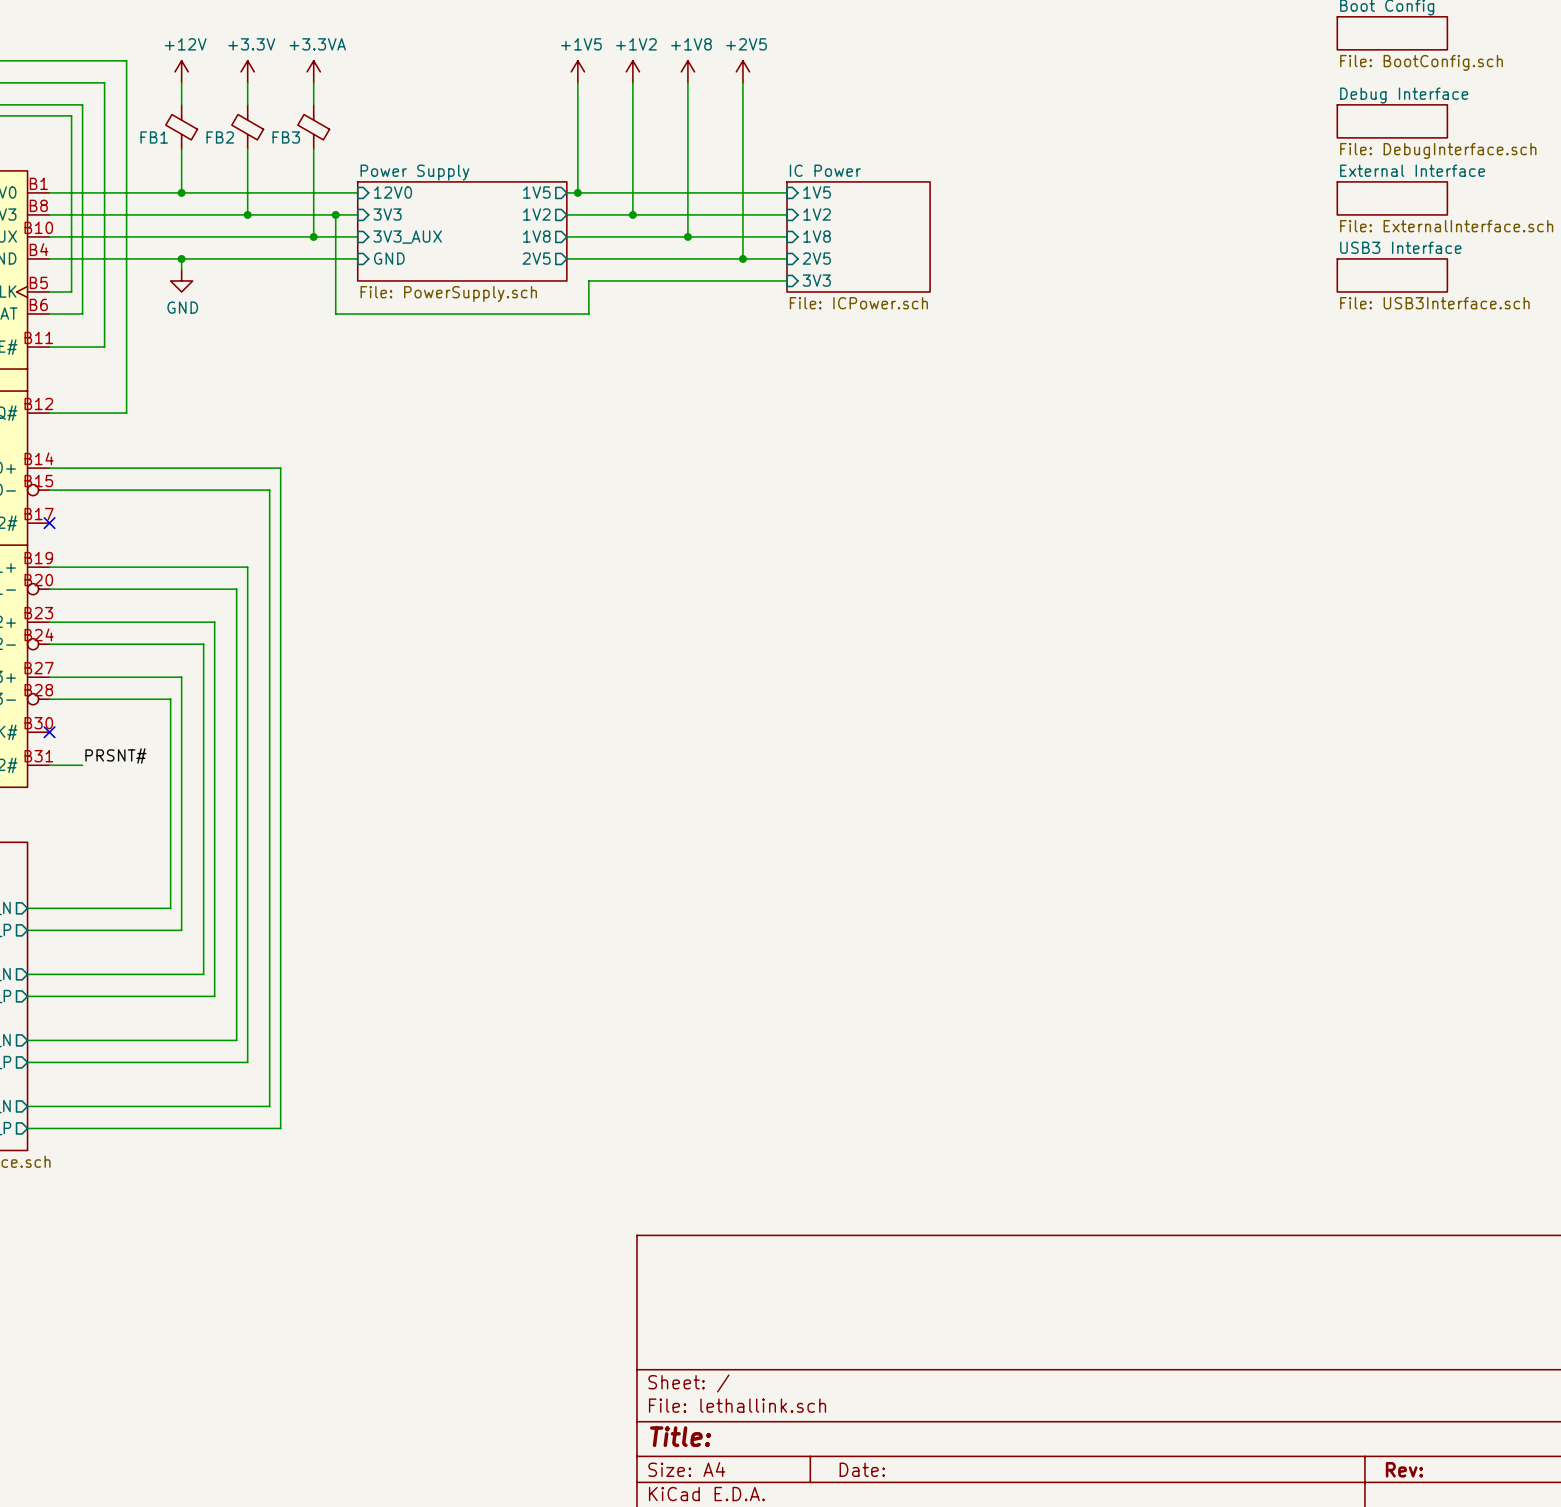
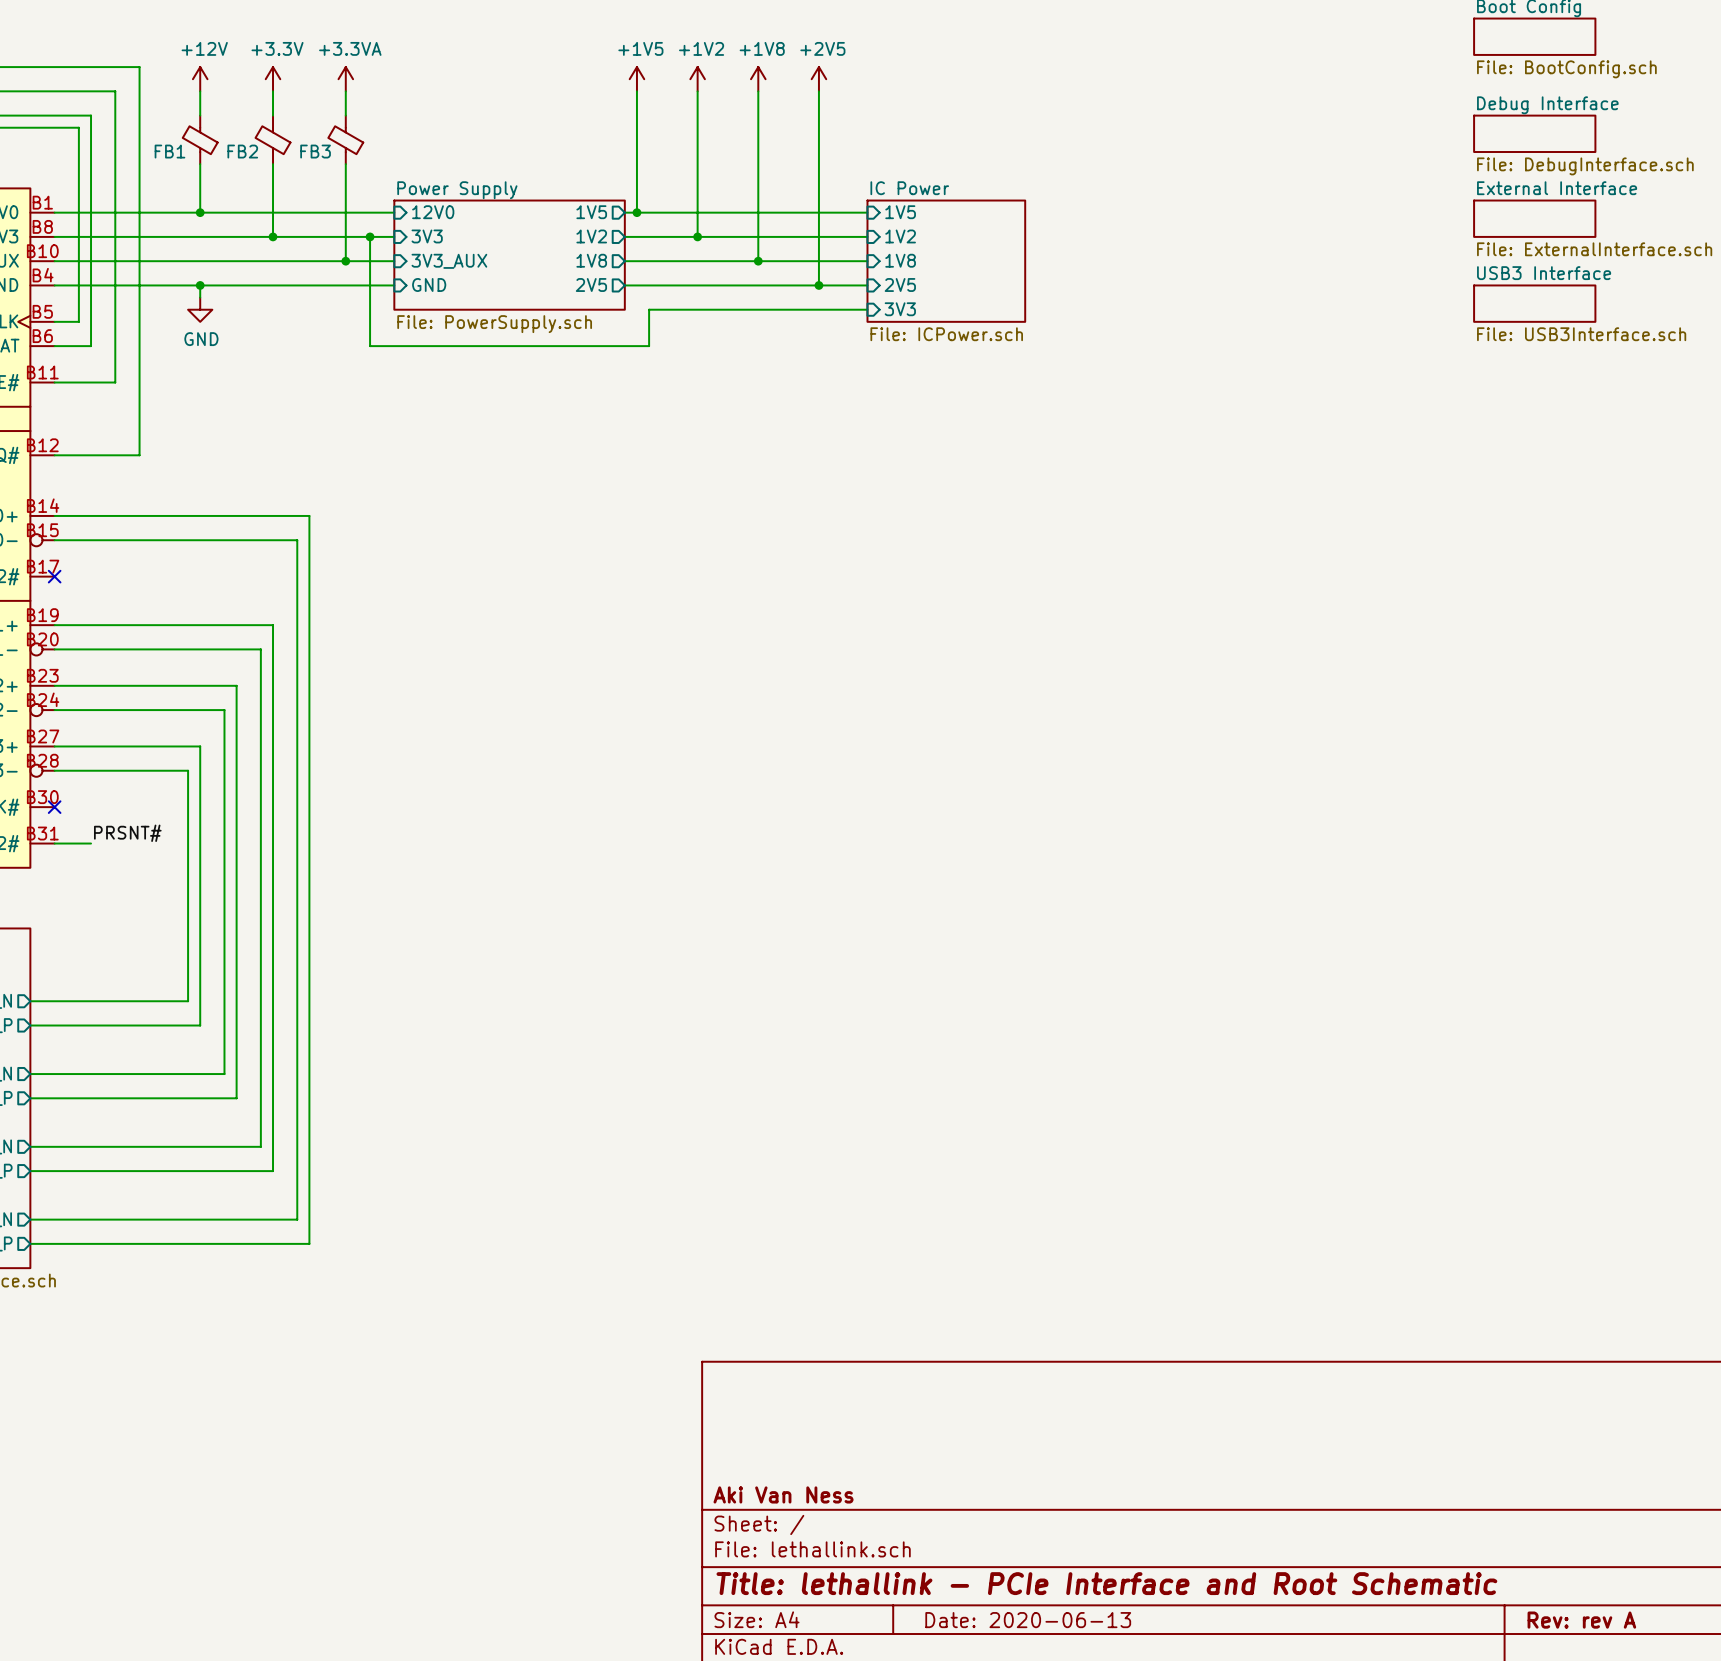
title block: none -> Aki Van Ness (783, 1494)
title block: Title: (680, 1436) -> Title: lethallink - PCIe Interface and Root Schematic (1106, 1583)
title block: Date: (862, 1469) -> Date: 2020-06-13 (1028, 1620)
title block: Rev: (1404, 1469) -> Rev: rev A (1581, 1620)

